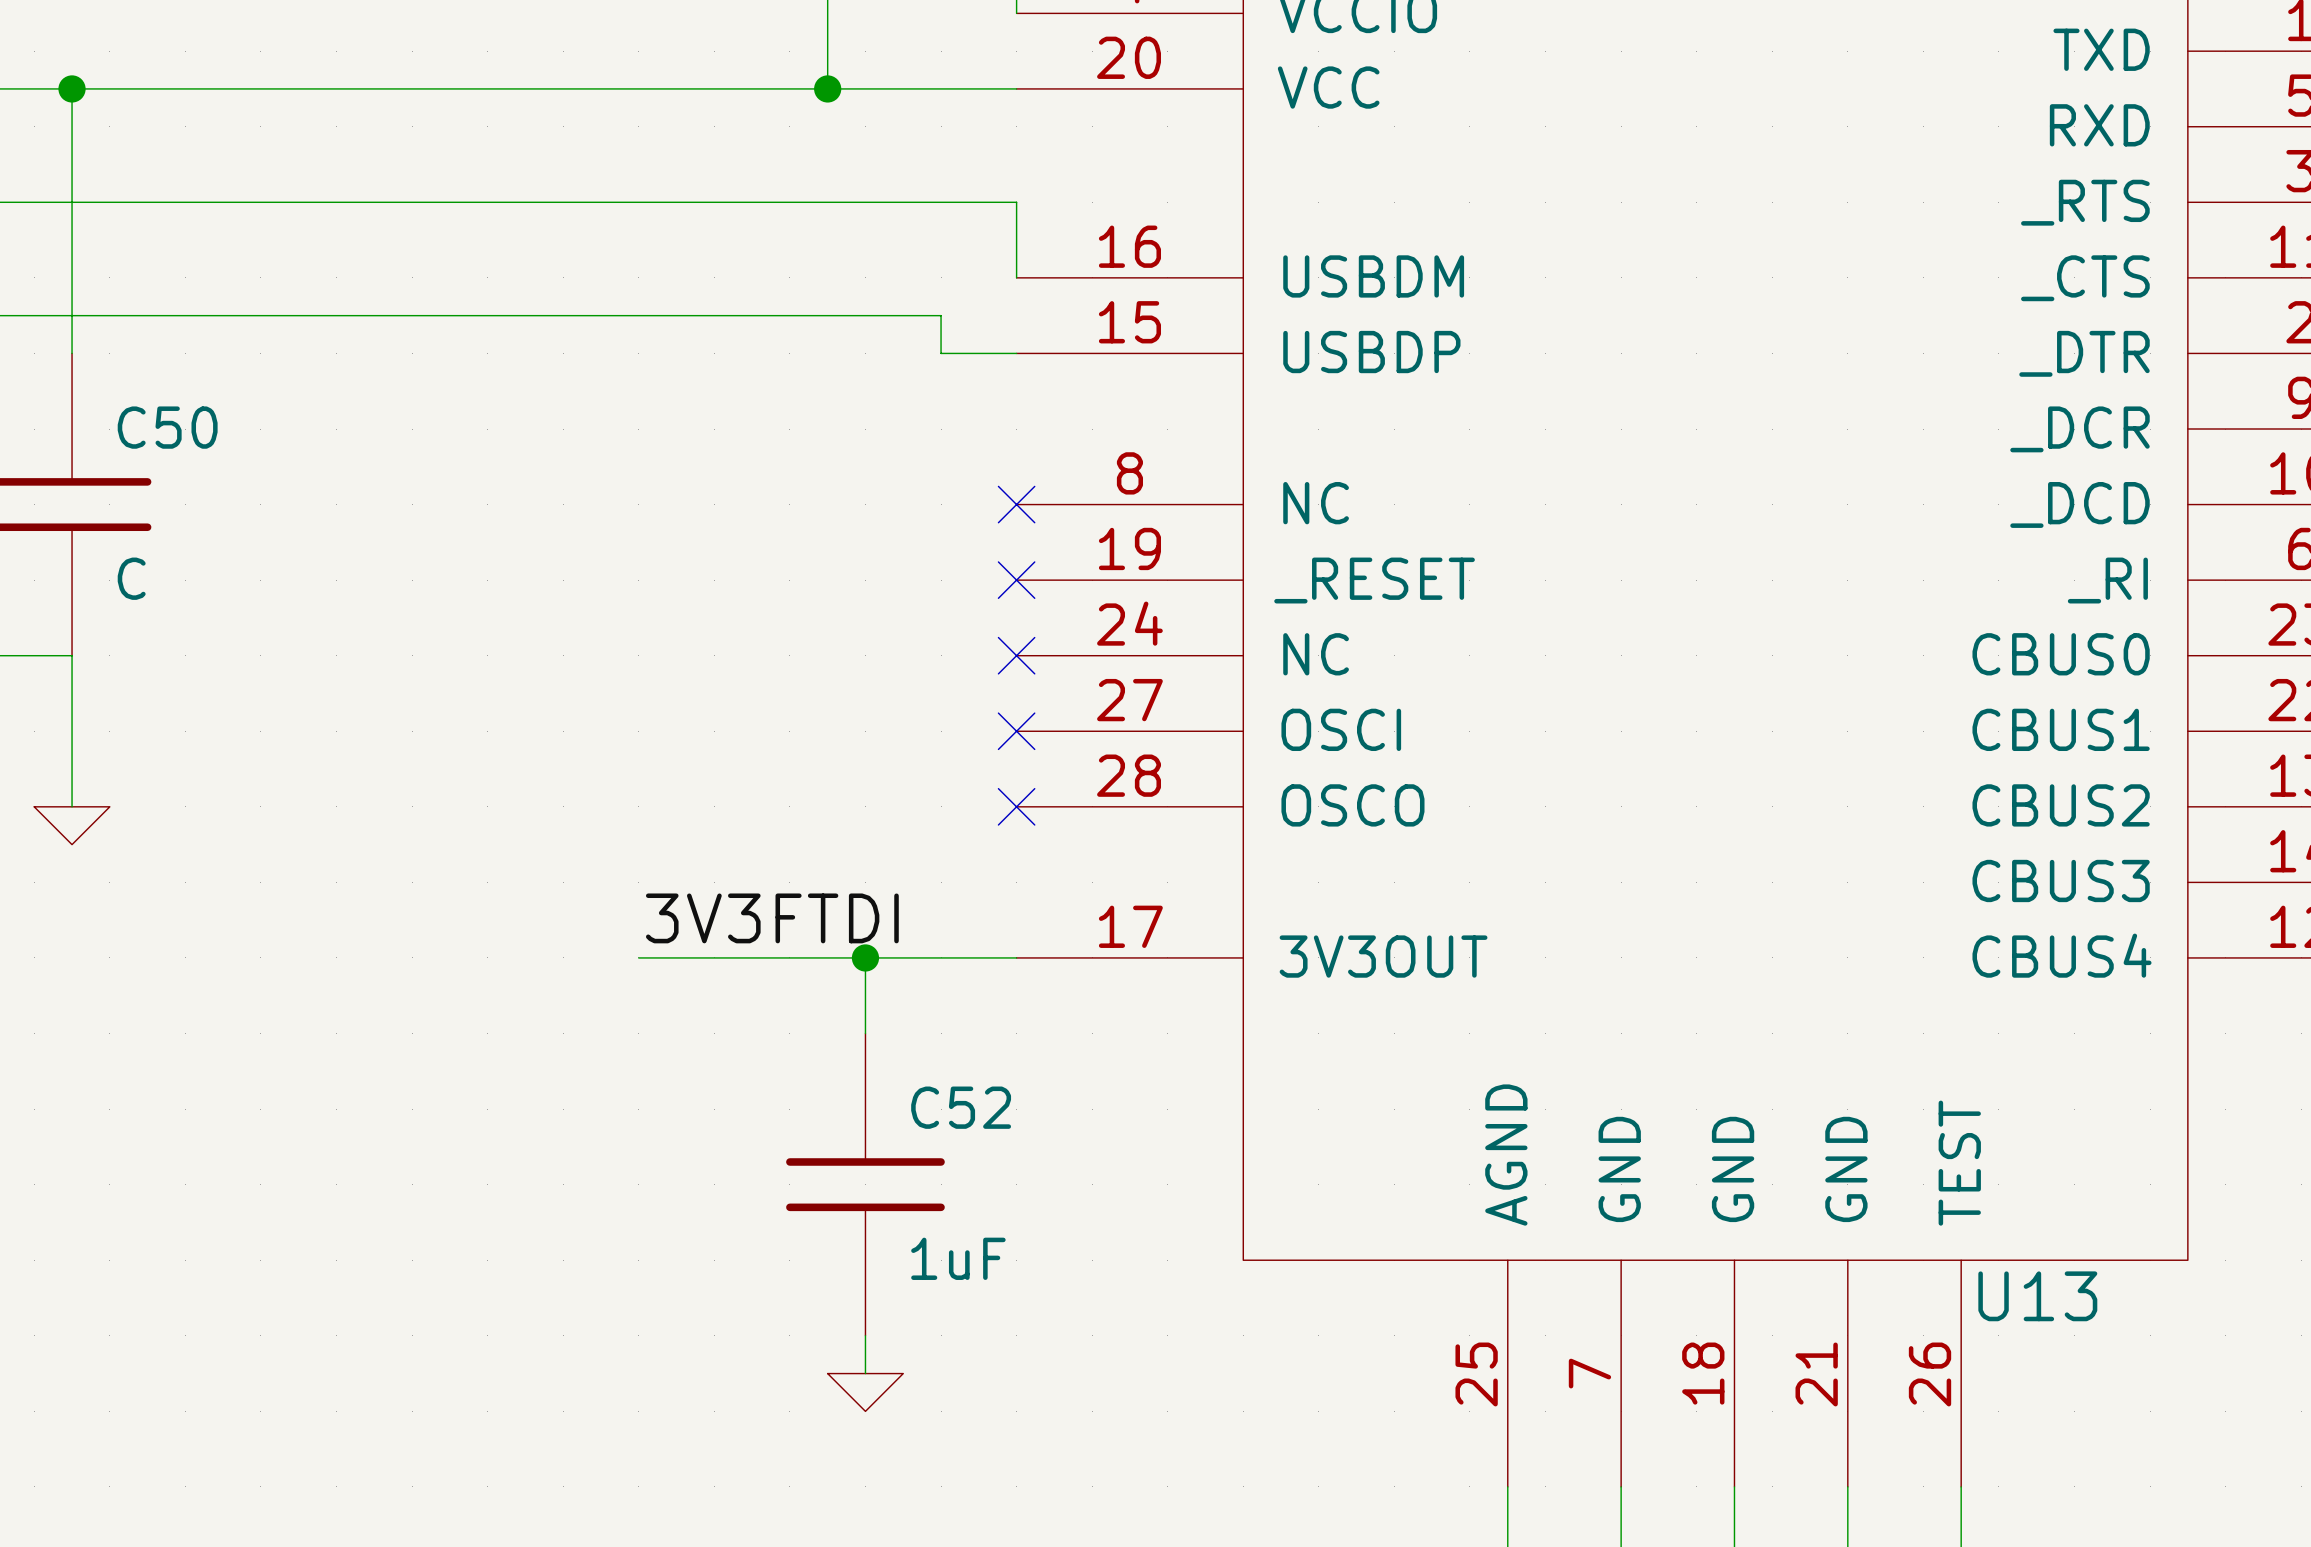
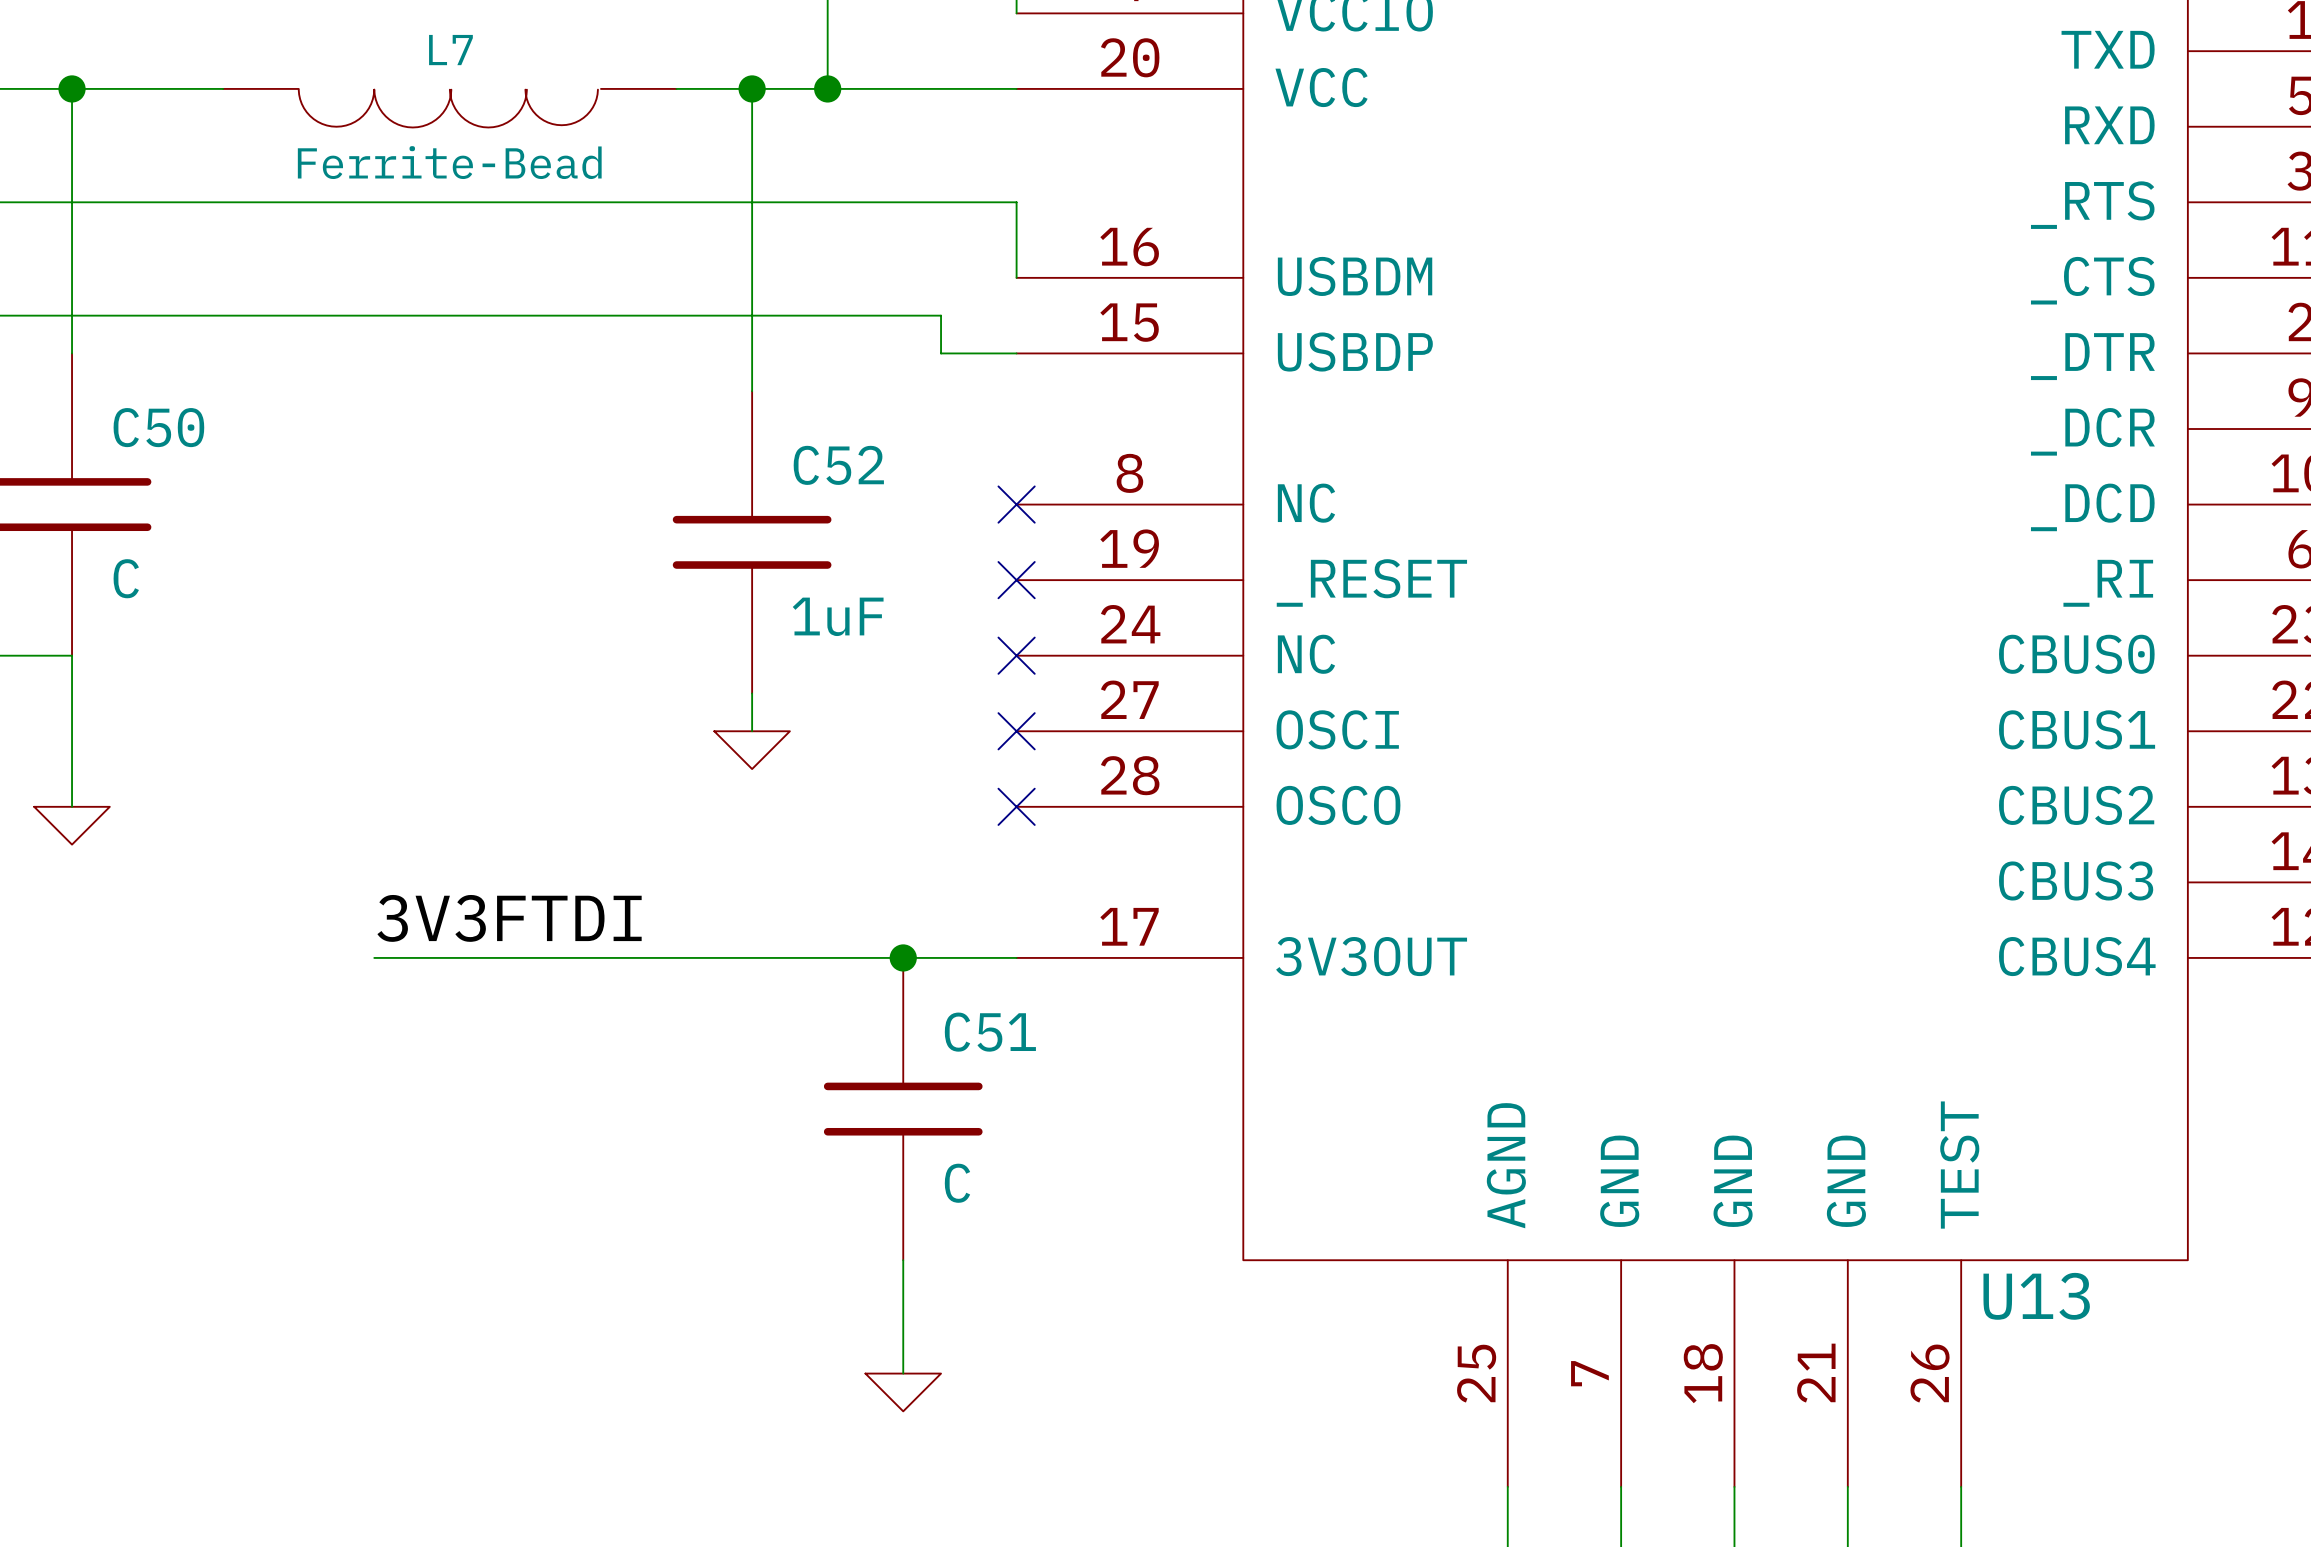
wire: (223, 88) (676, 88) -> none
wire: none -> (752, 88) (752, 391)
junction: none -> (752, 88)
L7: none -> Ferrite-Bead (449, 108)
power symbol: none -> (752, 750)
label position: 3V3FTDI (772, 918) -> 3V3FTDI (509, 918)
wire: none -> (374, 957) (638, 957)
wire: (865, 957) (865, 1033) -> none
junction position: (865, 957) -> (903, 957)
C51: none -> C (903, 1109)
C52 position: (865, 1184) -> (752, 542)
wire: none -> (903, 1260) (903, 1373)
wire: (865, 1335) (865, 1373) -> (752, 693) (752, 731)
power symbol position: (865, 1392) -> (903, 1392)

